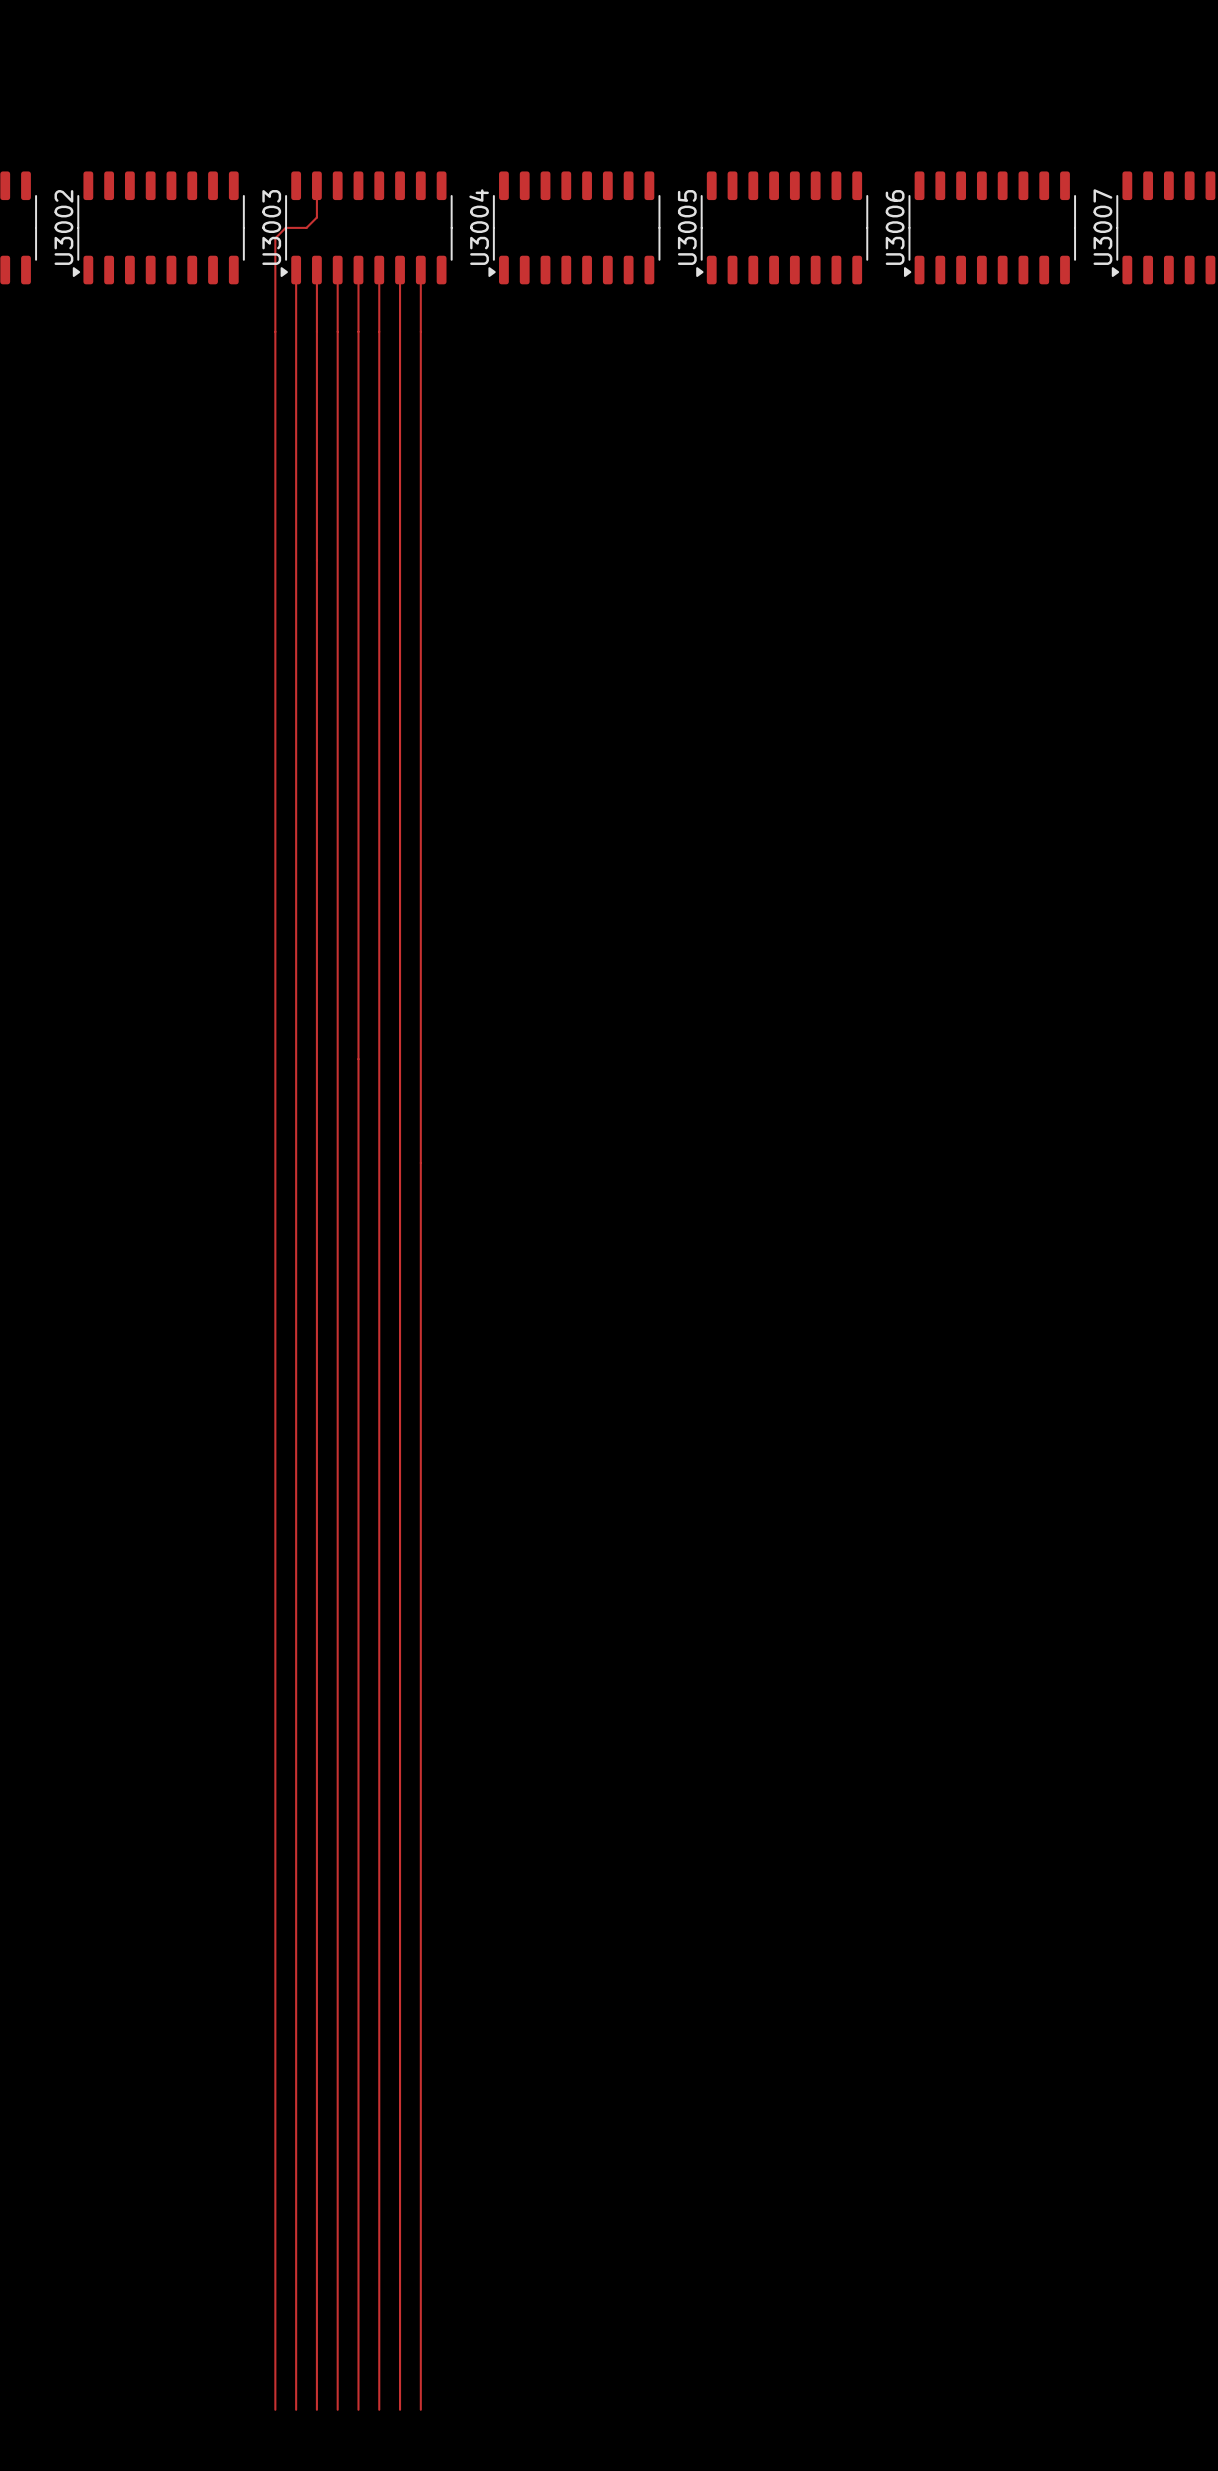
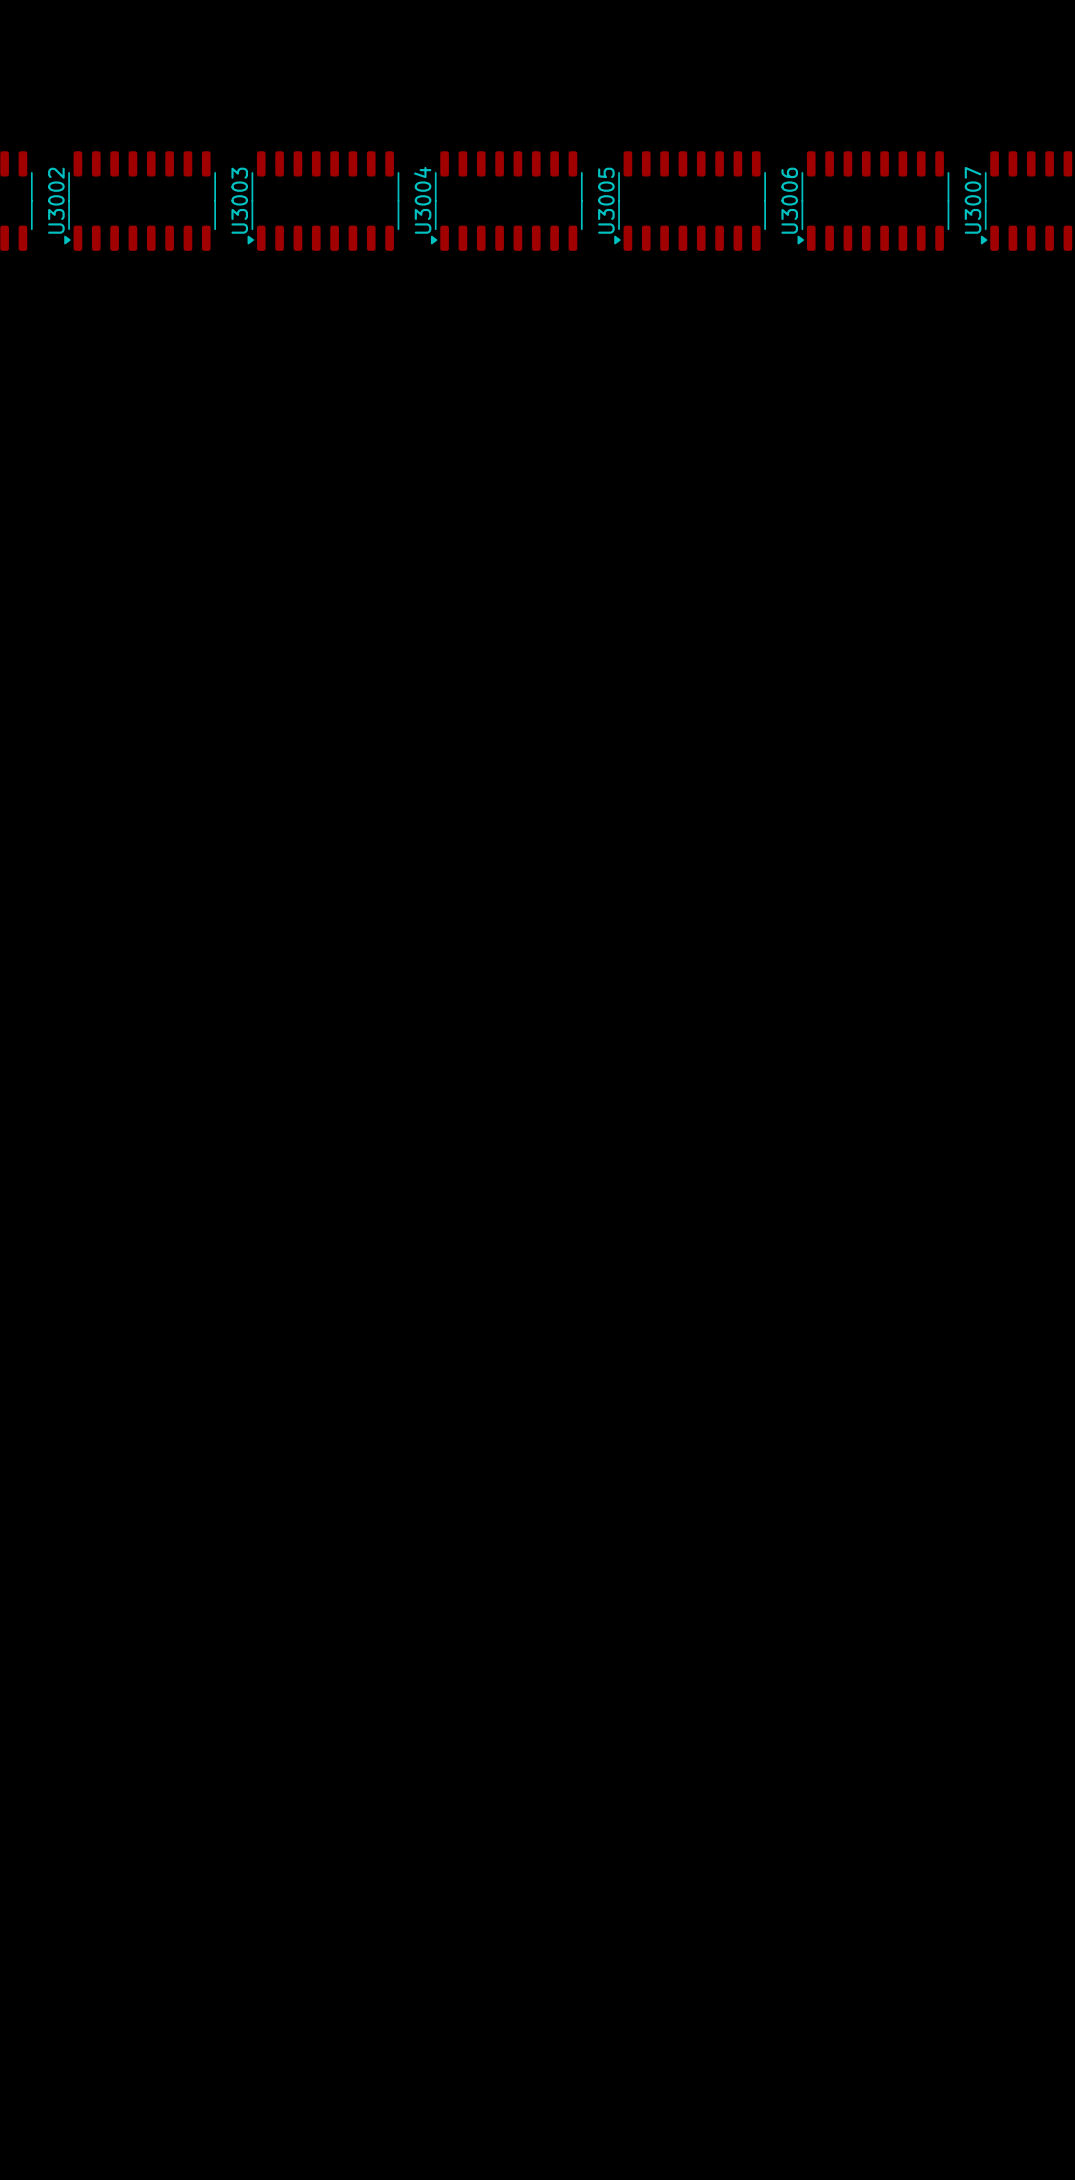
track: (316, 185) (316, 217) (306, 227) (285, 227) (275, 238) (275, 2409) -> none
track: (296, 270) (296, 2409) -> none
track: (316, 270) (316, 2409) -> none
track: (337, 270) (337, 2409) -> none
track: (358, 270) (358, 2409) -> none
track: (379, 270) (379, 2409) -> none
track: (400, 270) (400, 2409) -> none
track: (420, 270) (420, 2409) -> none

